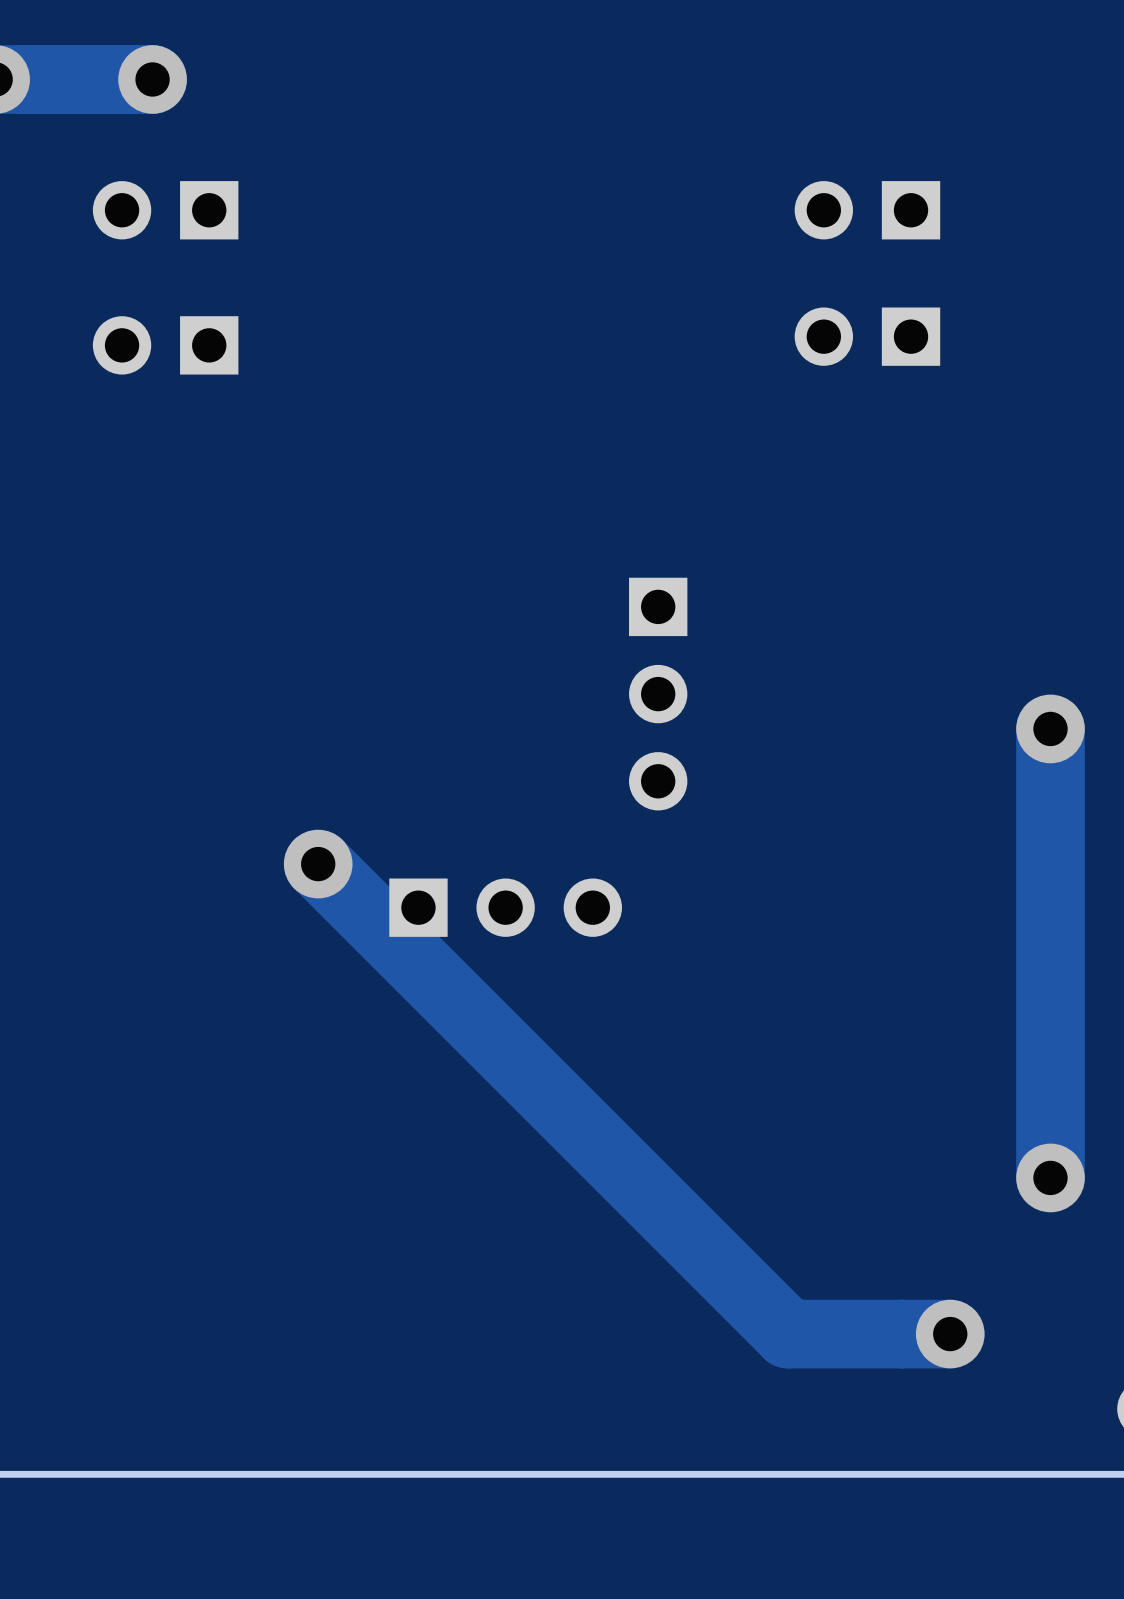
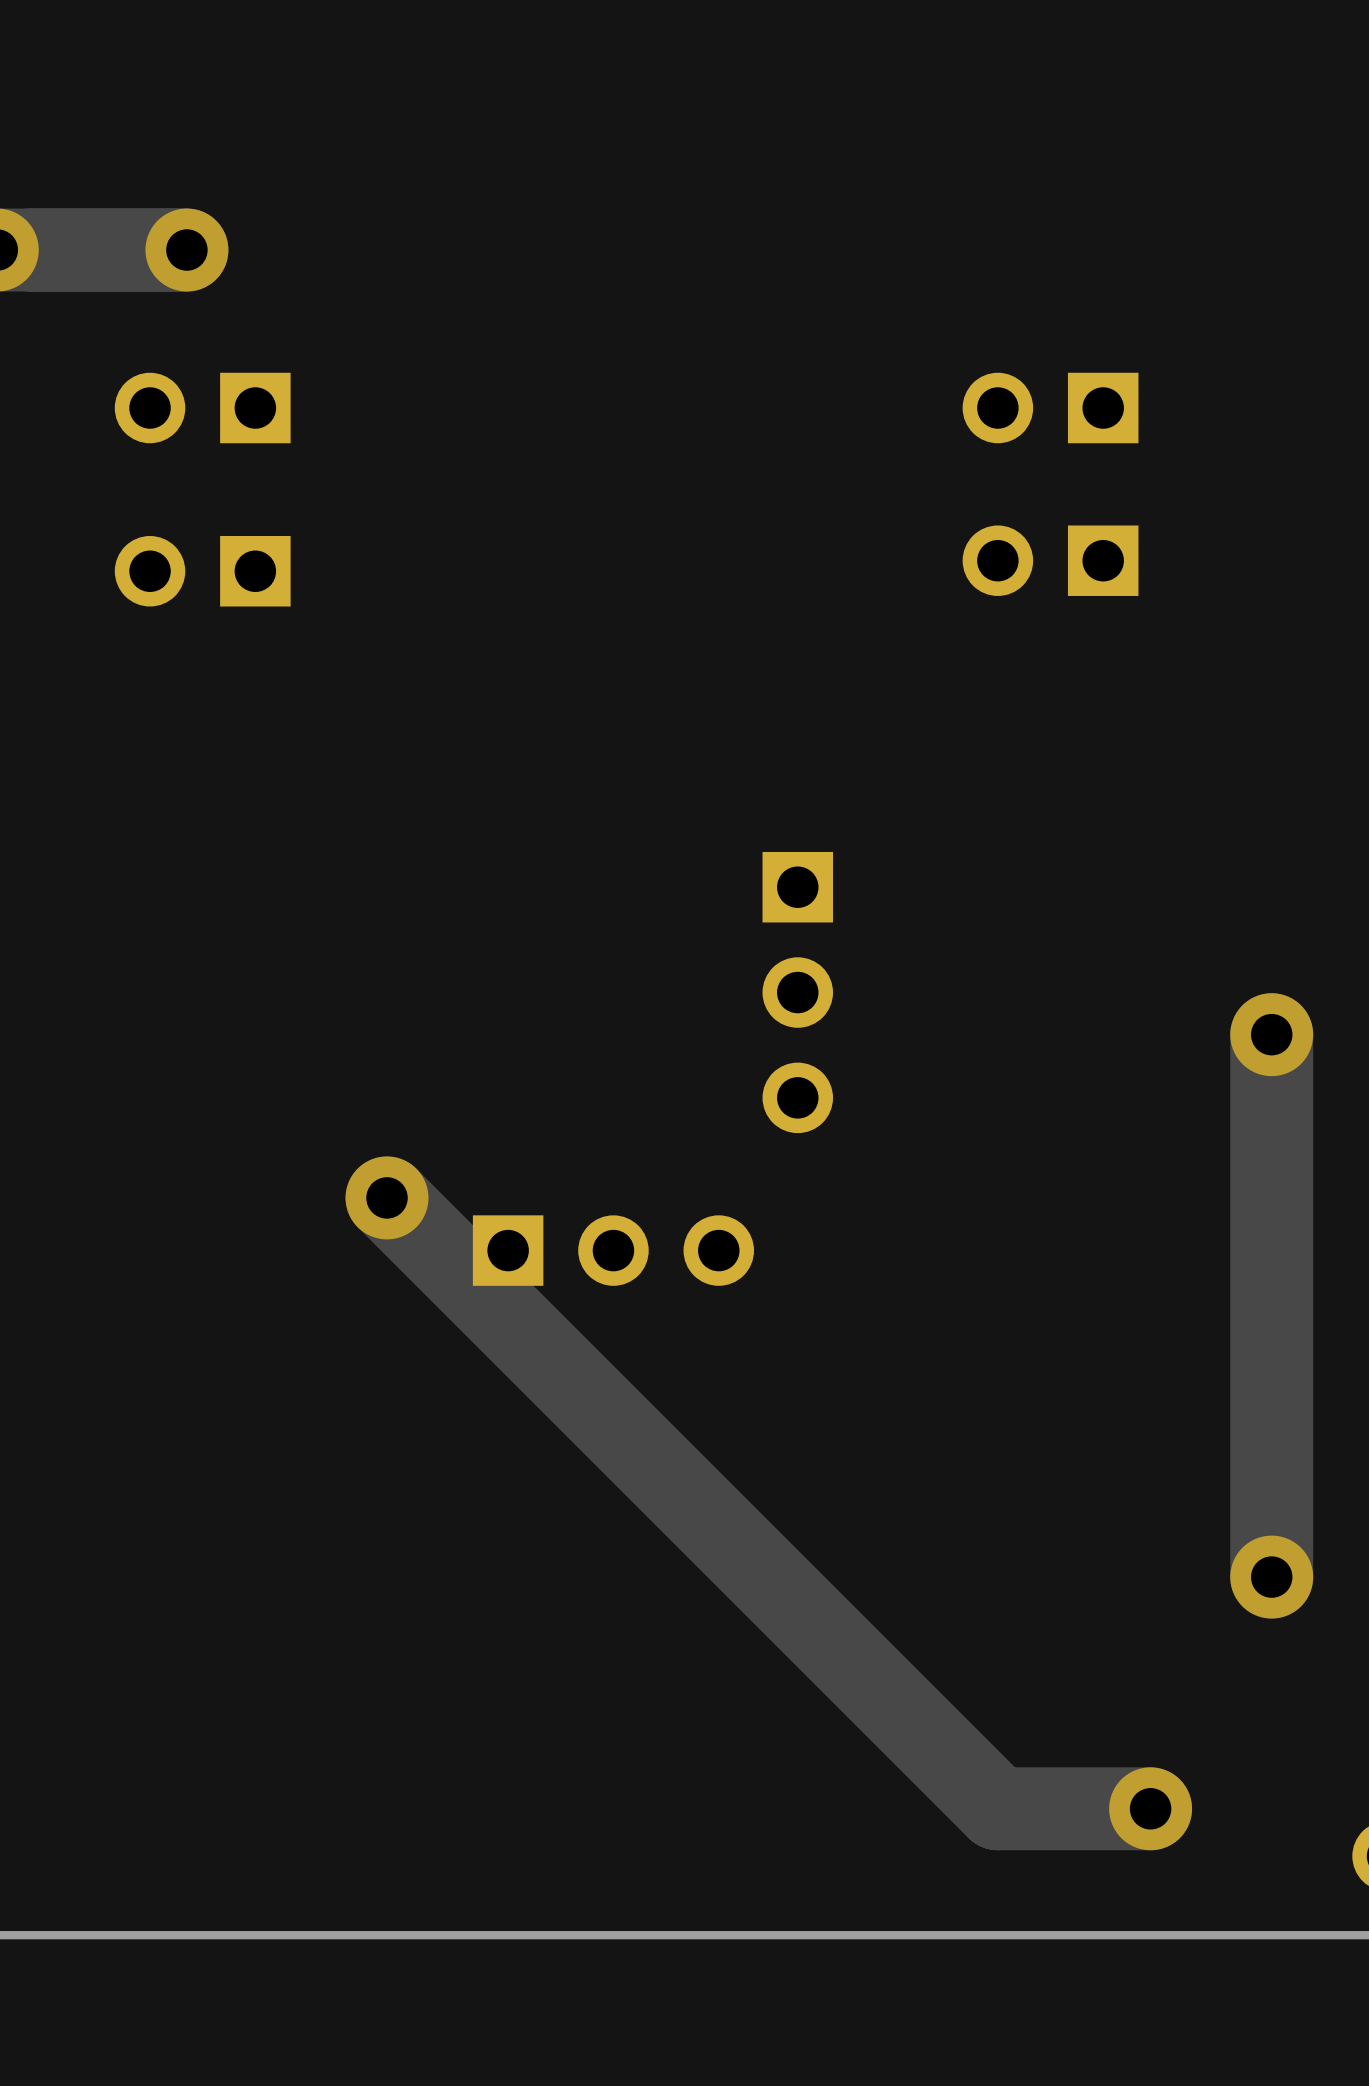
track: (950, 1334) (788, 1334) -> (1150, 1808) (997, 1808) (954, 1765)
via position: (950, 1334) -> (1150, 1808)

